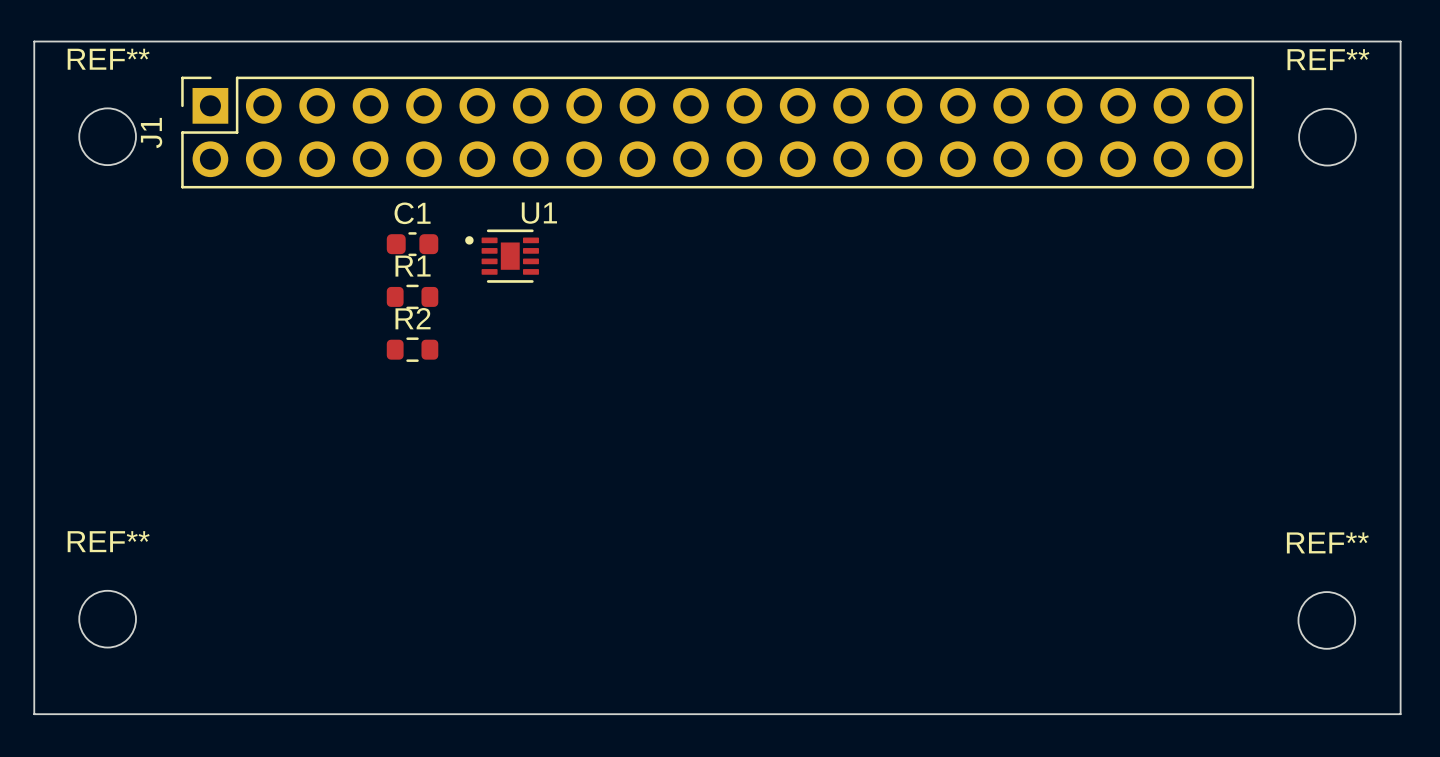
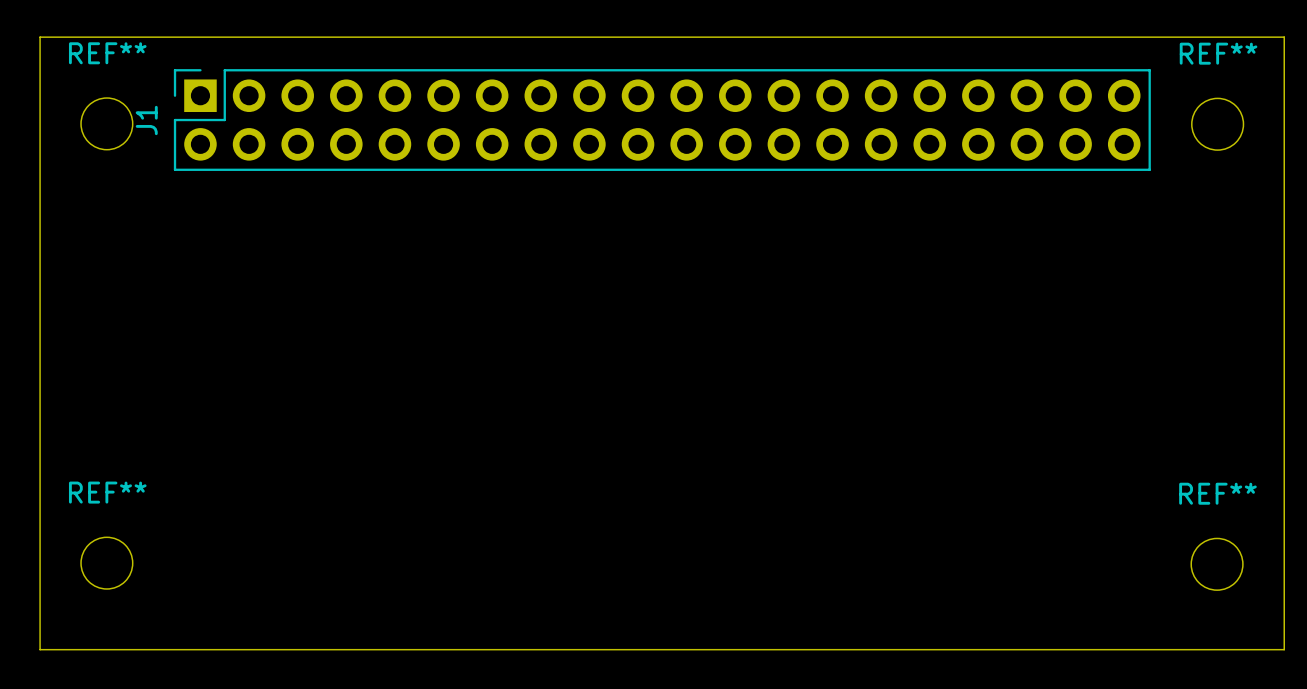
C1: (412, 244) -> none
U1: (502, 256) -> none
R1: (412, 296) -> none
R2: (412, 349) -> none

